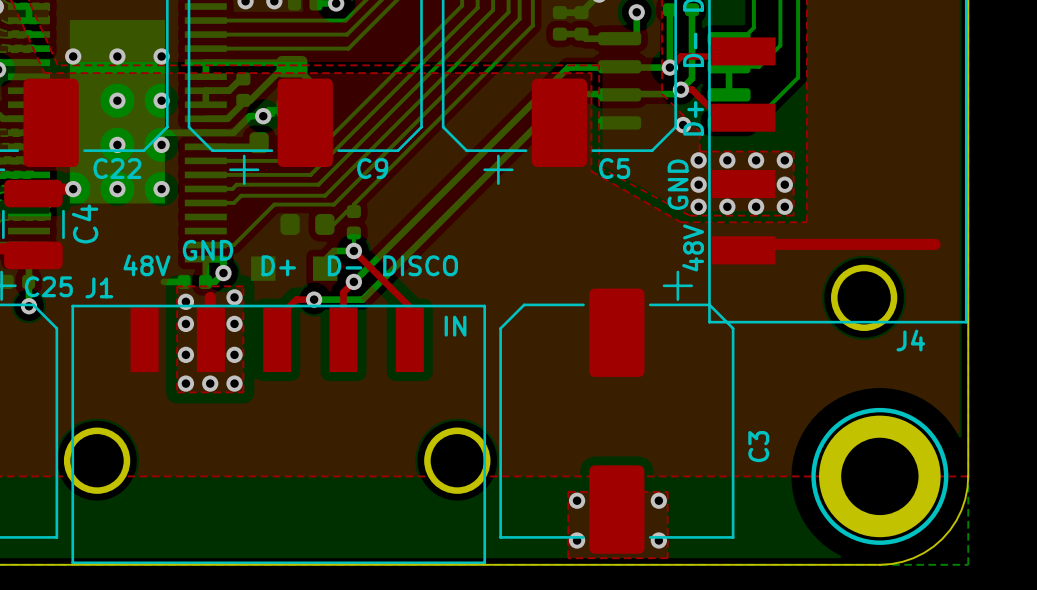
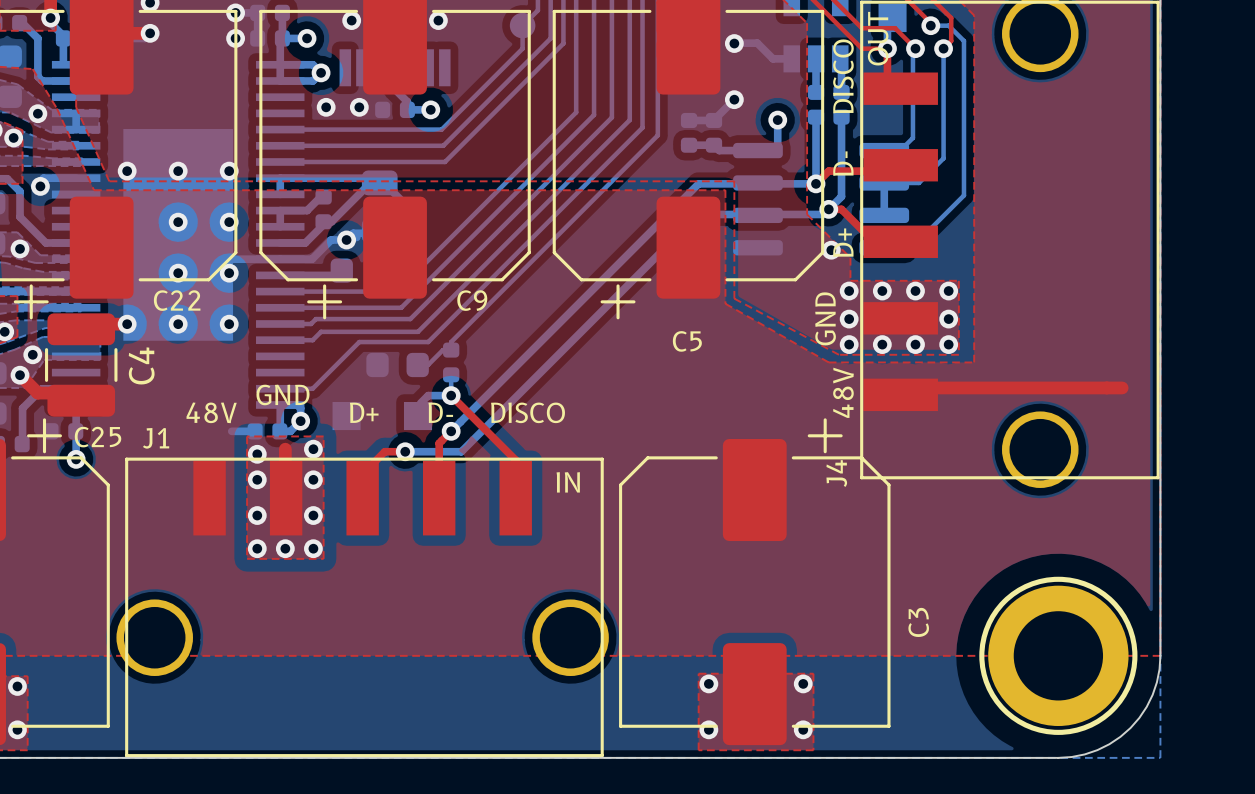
C5 name position: C5 (614, 168) -> C5 (687, 341)
J4 name rotation: 0° (910, 340) -> 90° counterclockwise (836, 473)
J4 name position: J4 (910, 340) -> J4 (836, 473)

